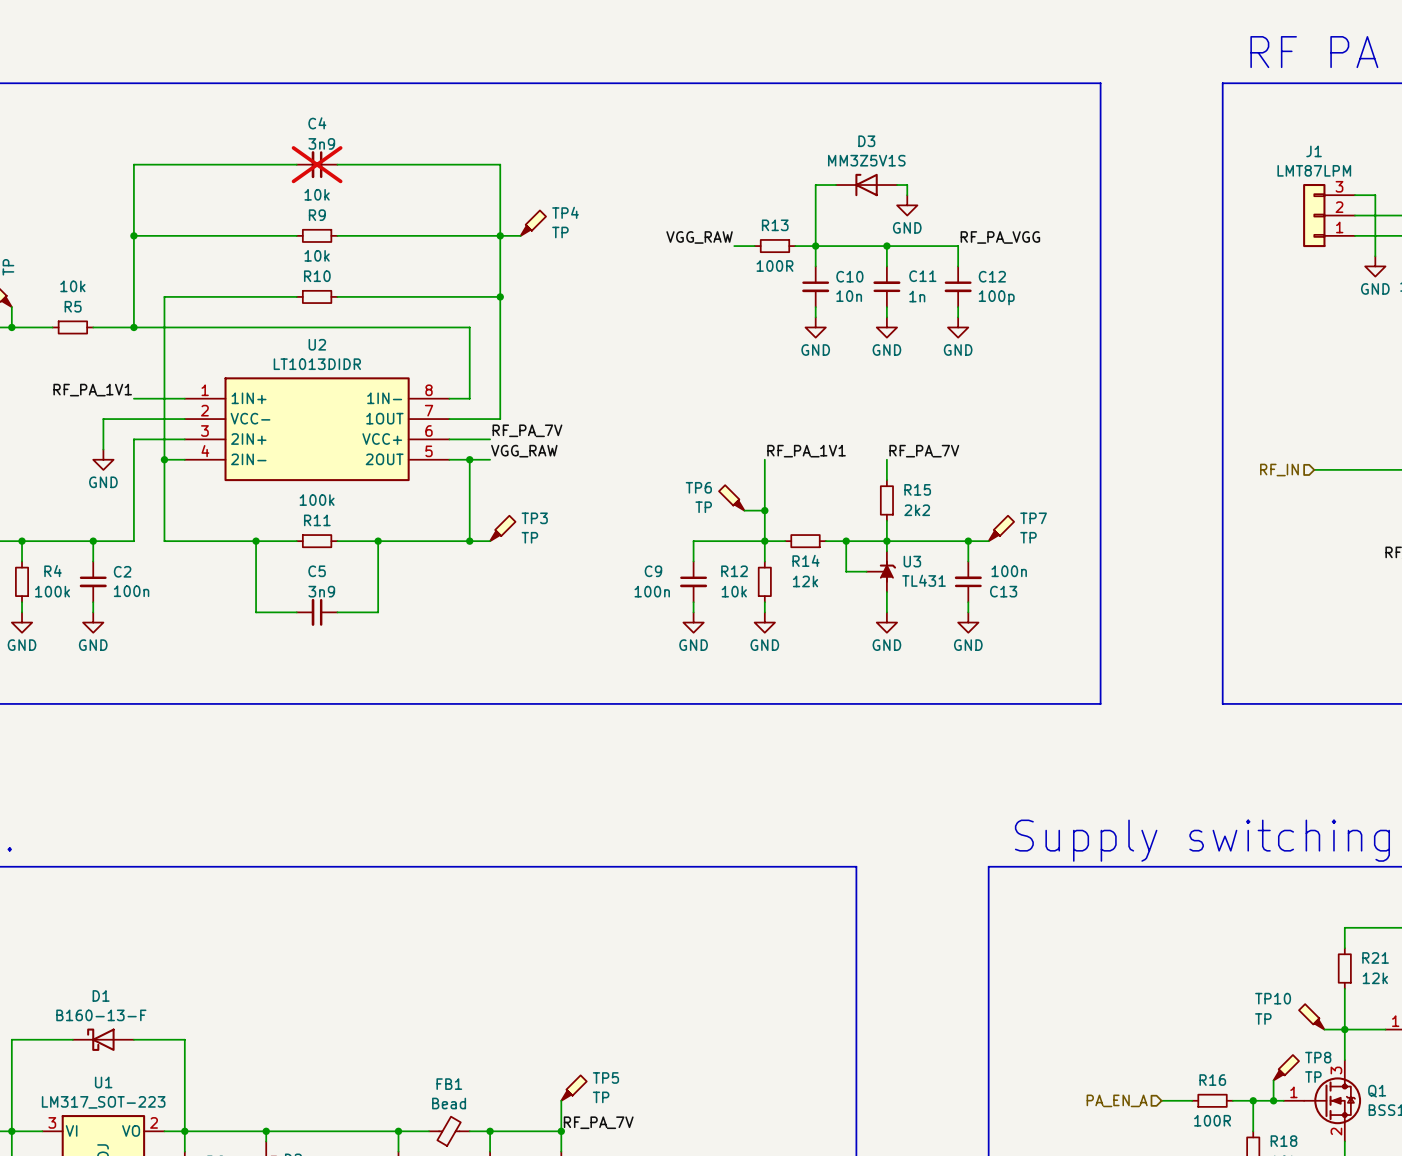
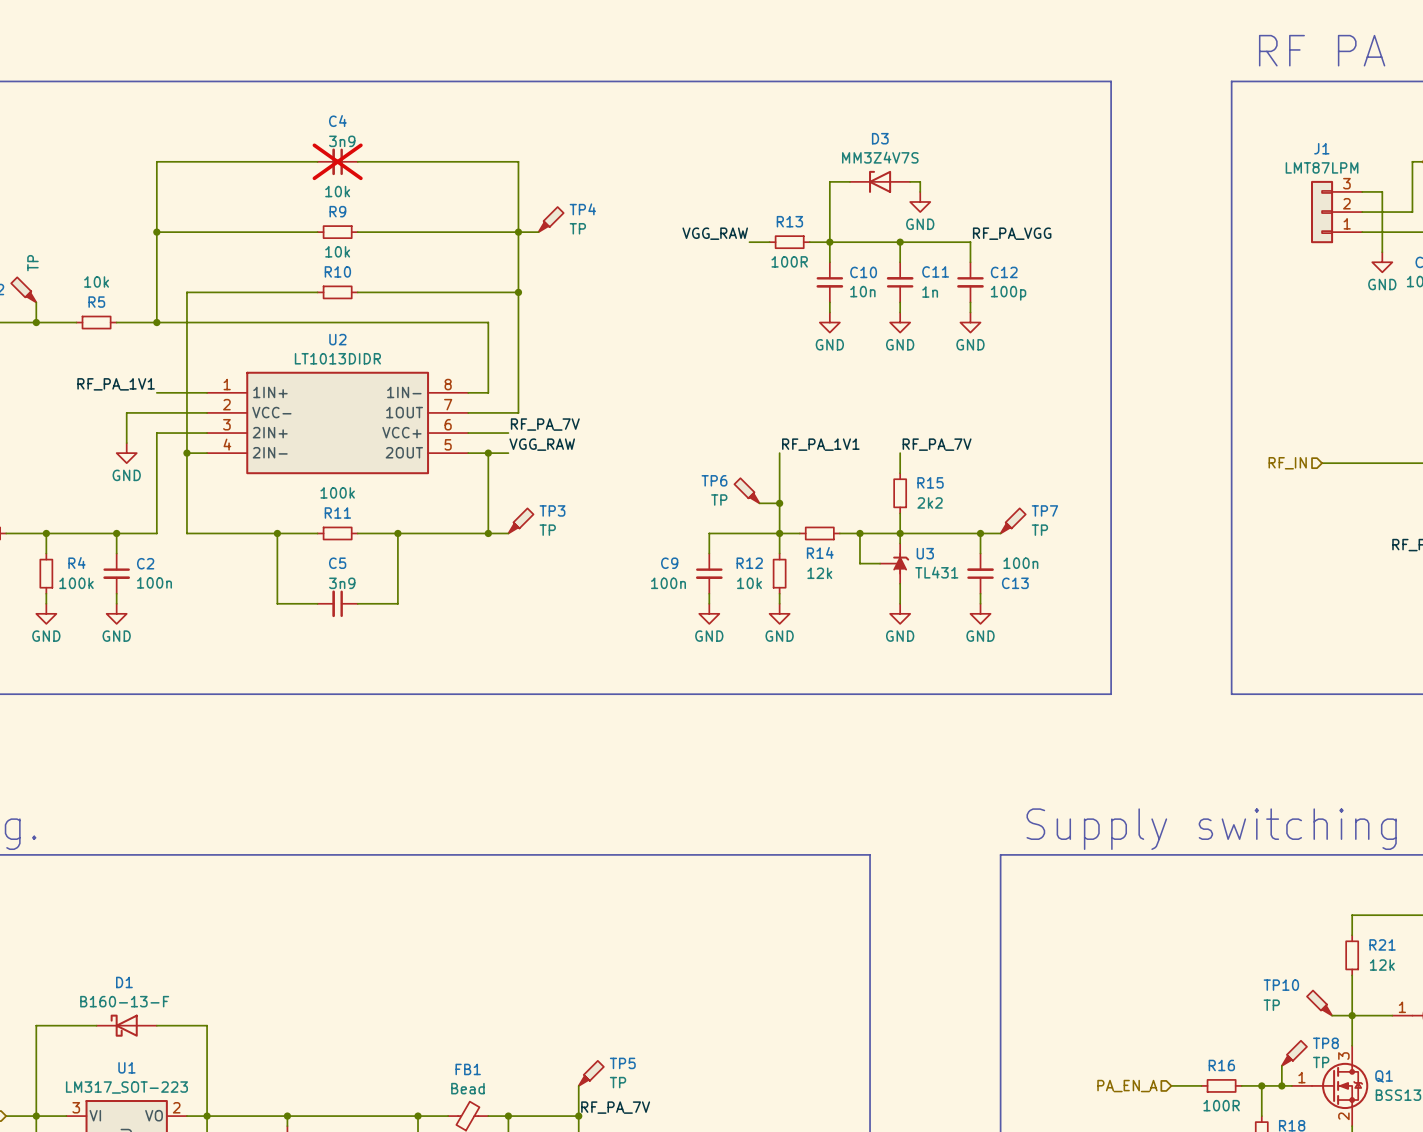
D3 value: MM3Z5V1S (866, 160) -> MM3Z4V7S (880, 157)

